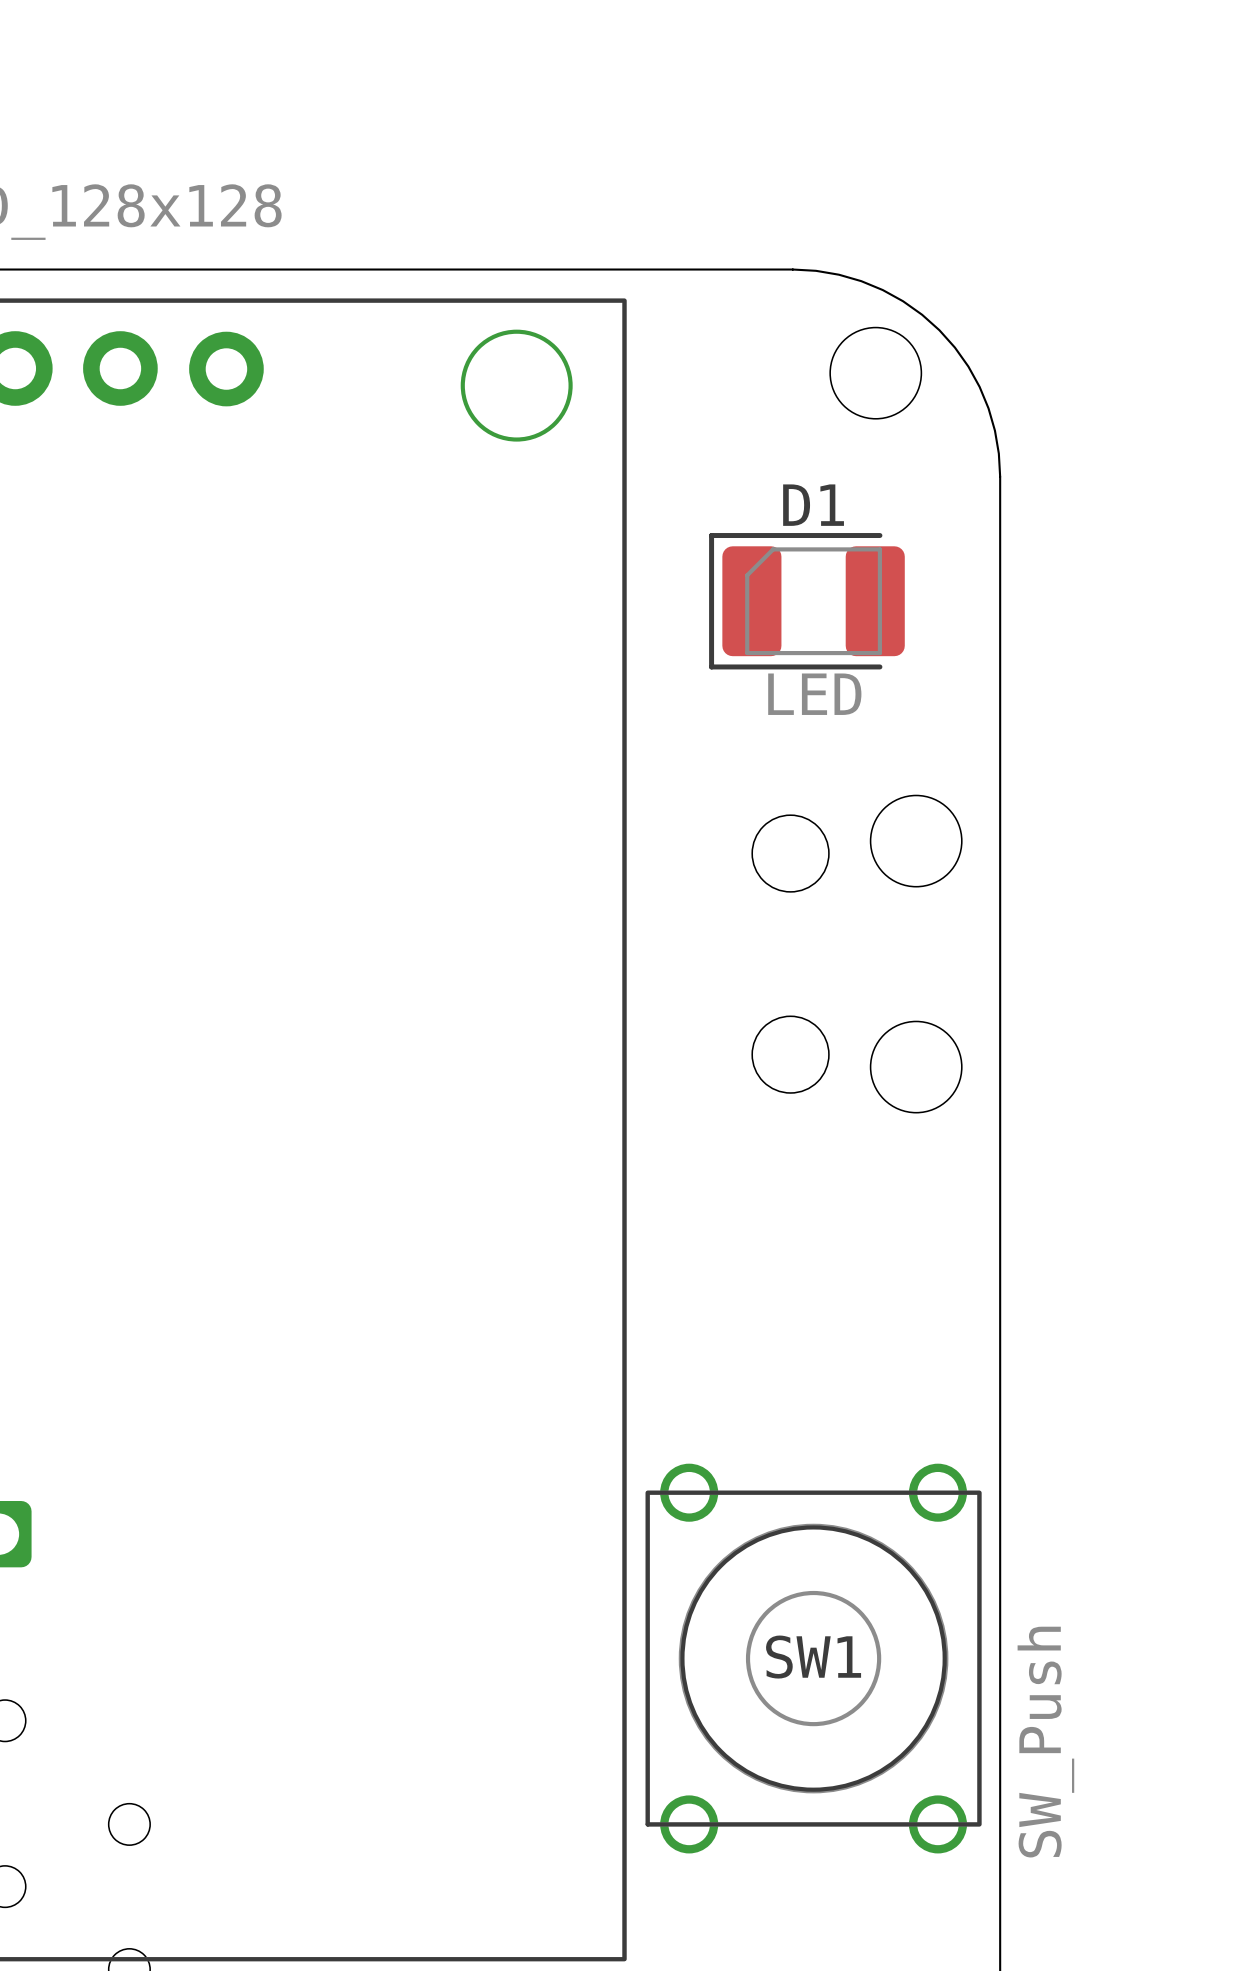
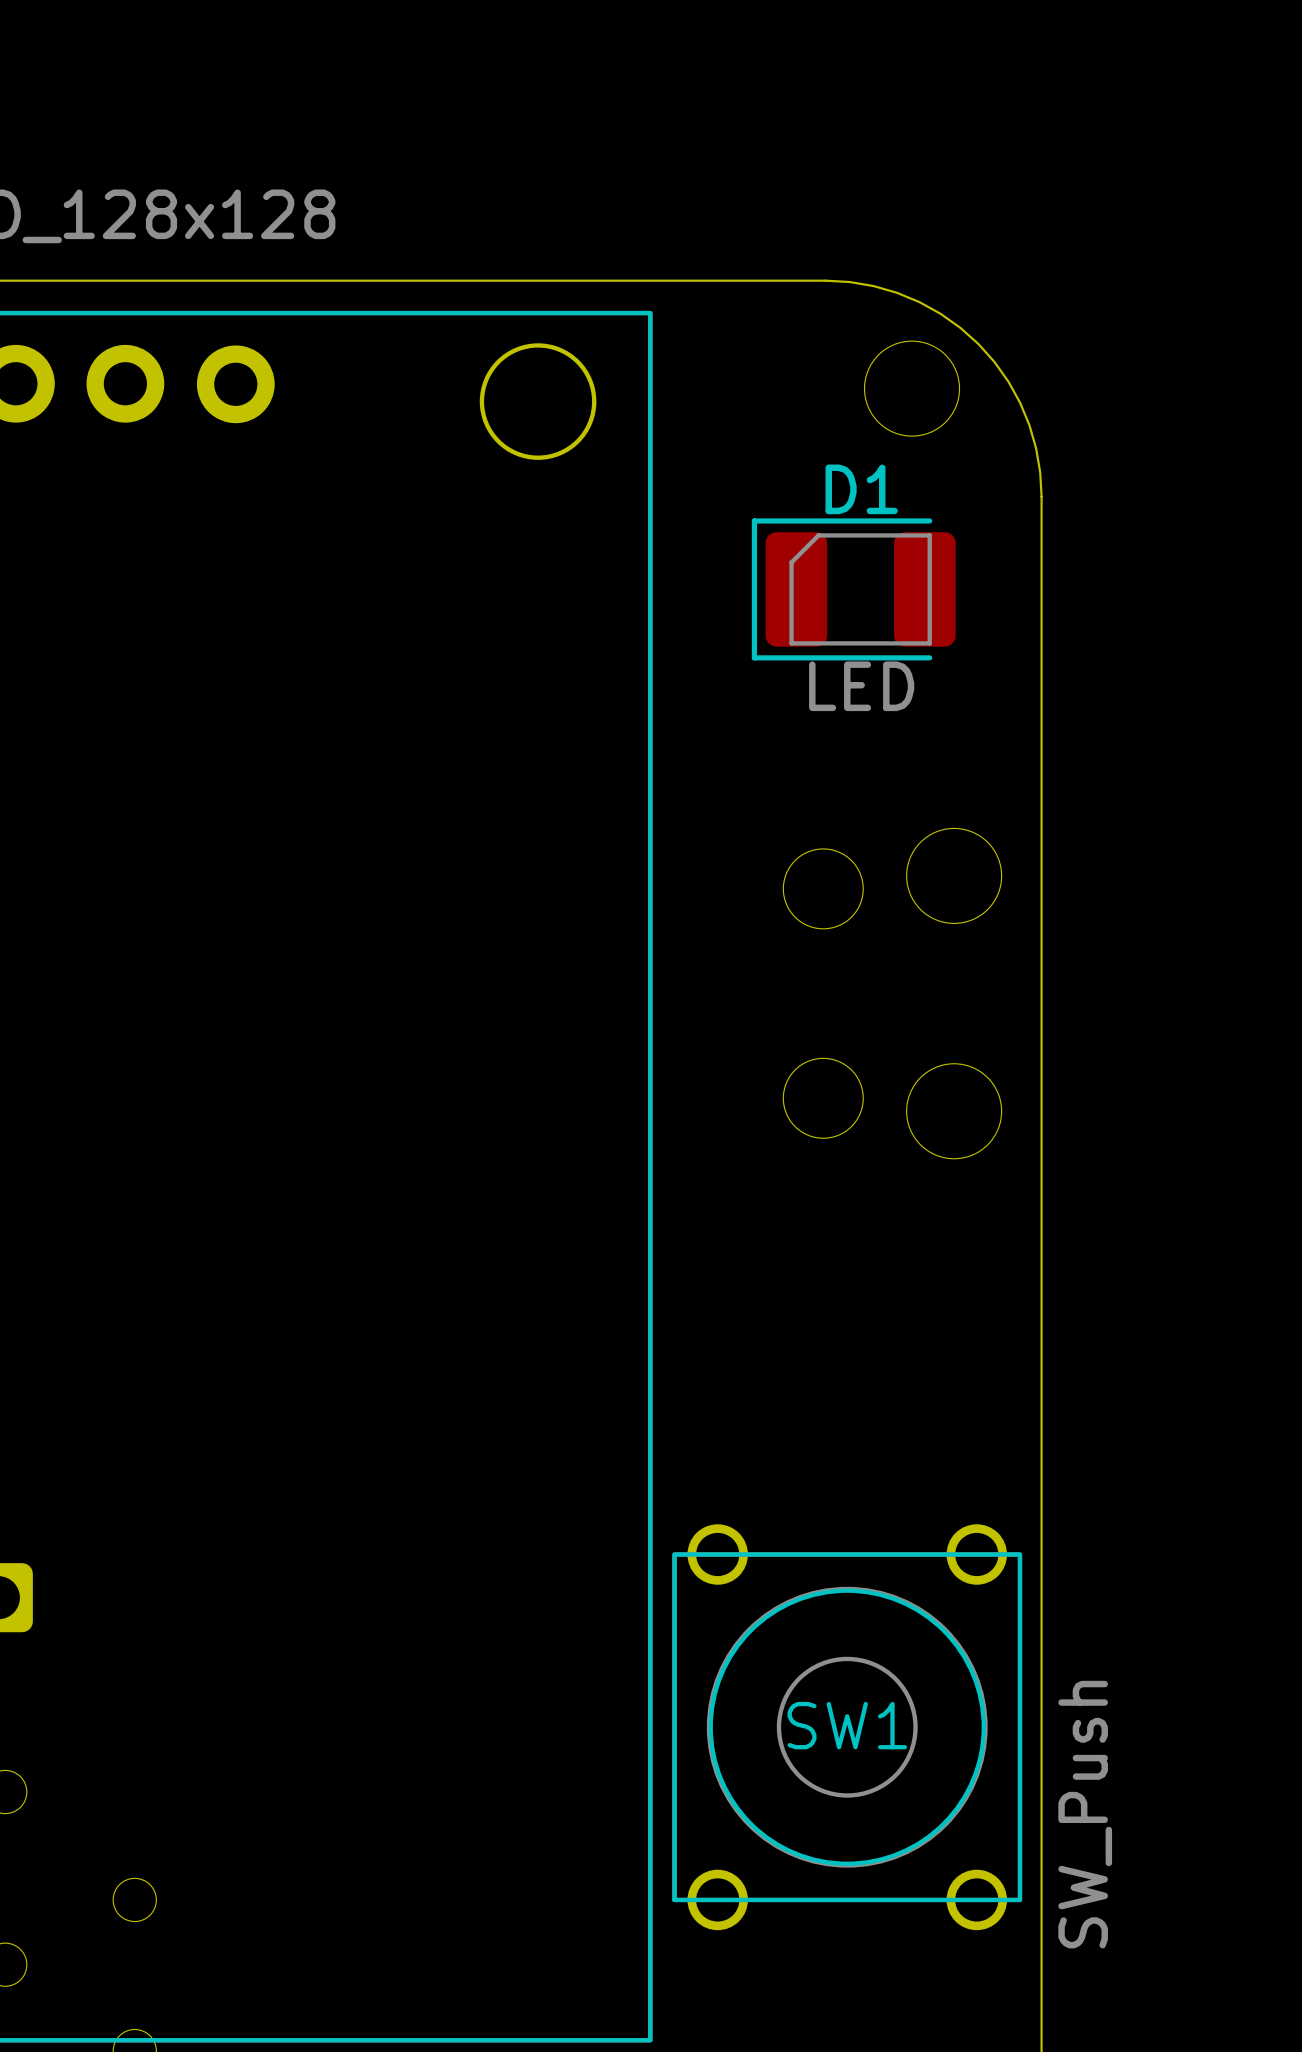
D1 position: (806, 601) -> (853, 589)

